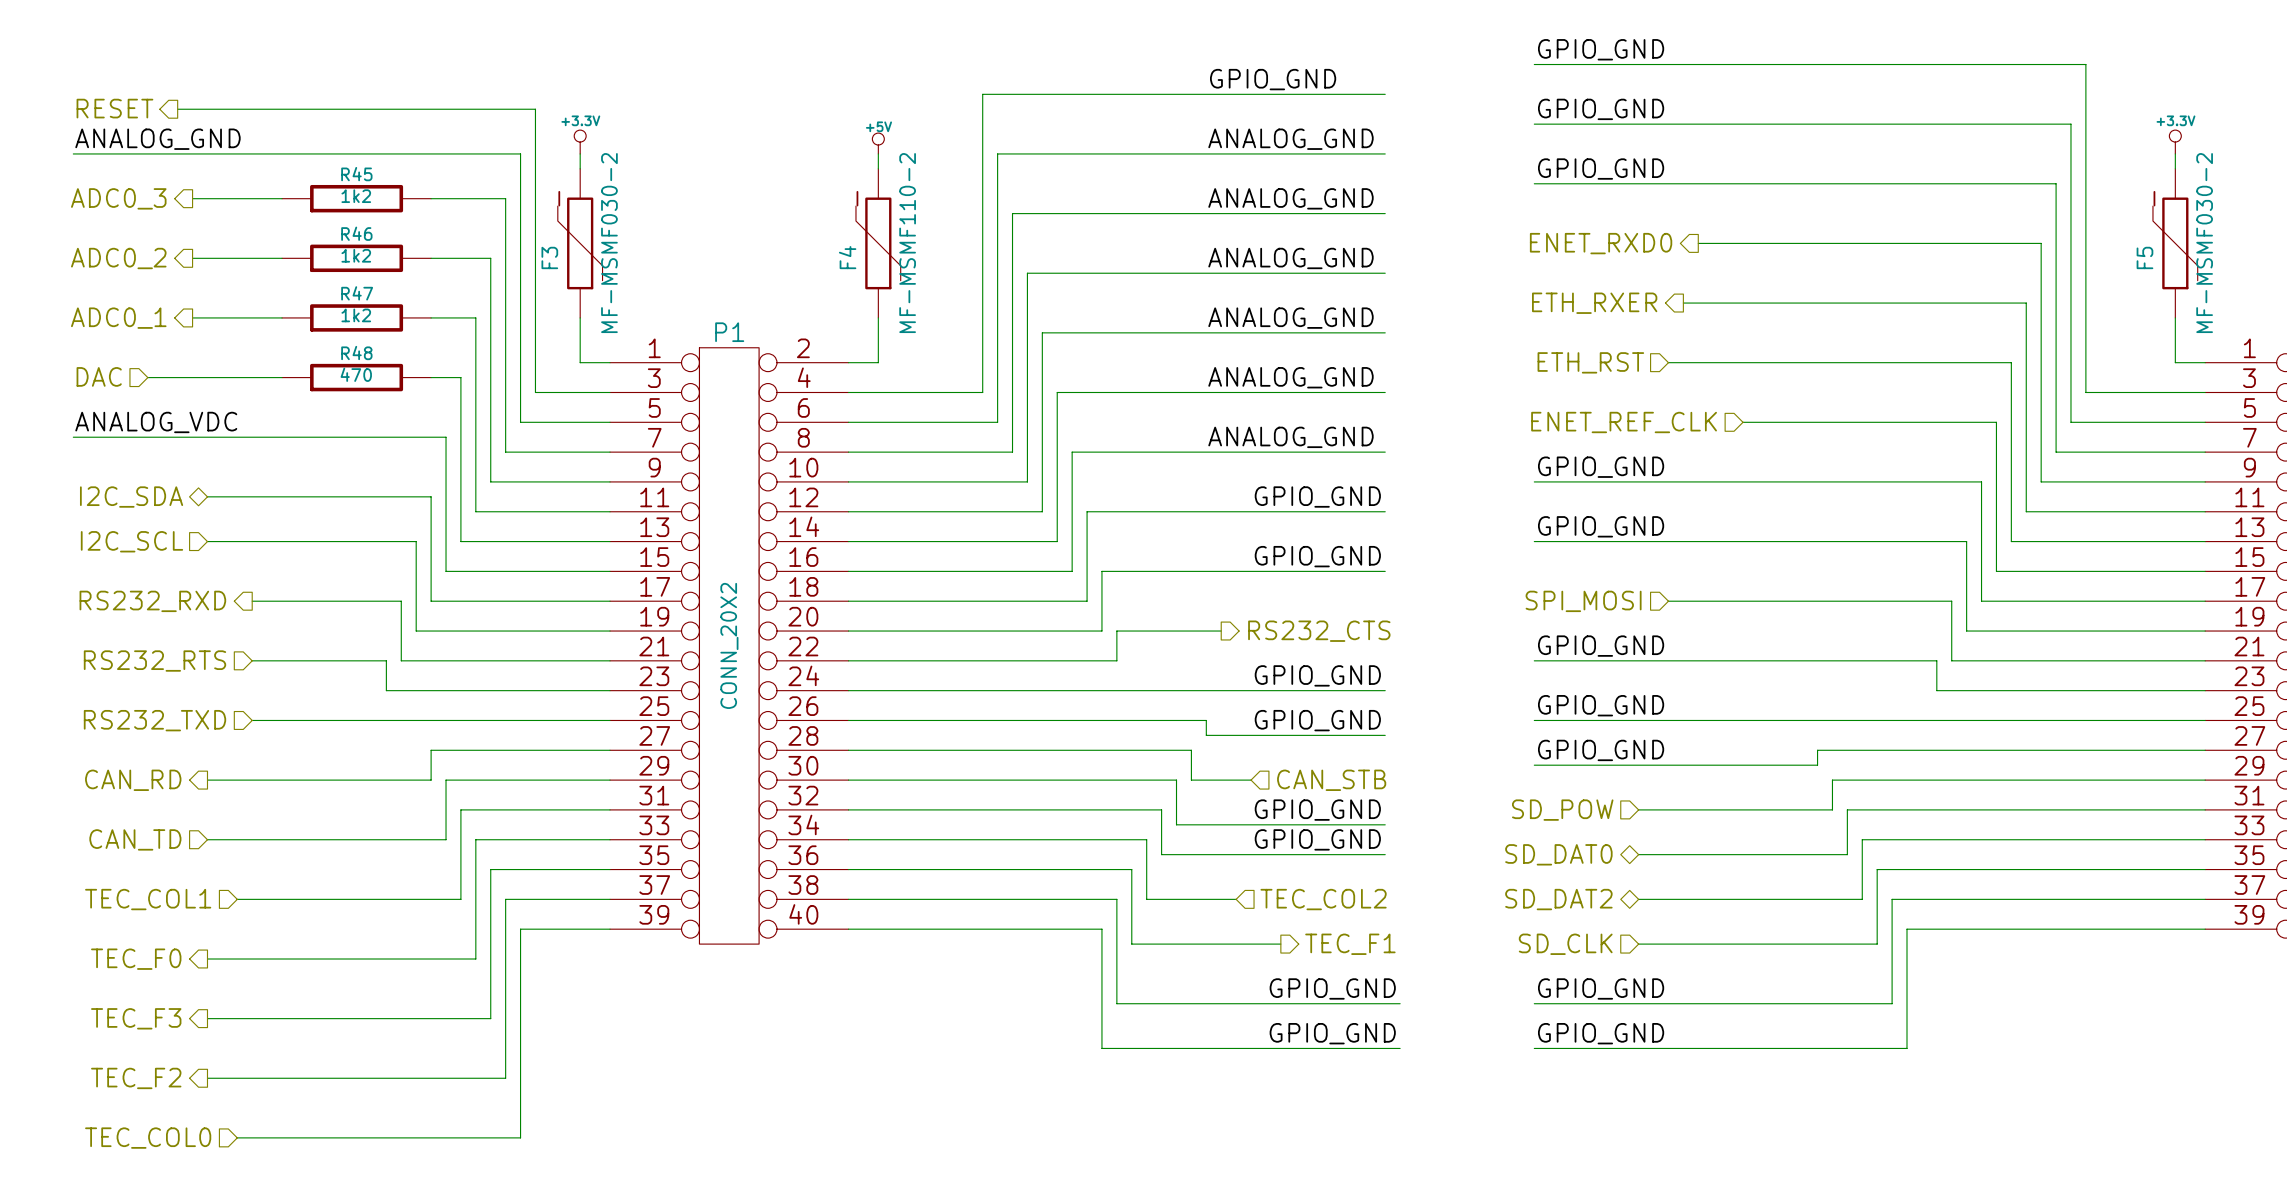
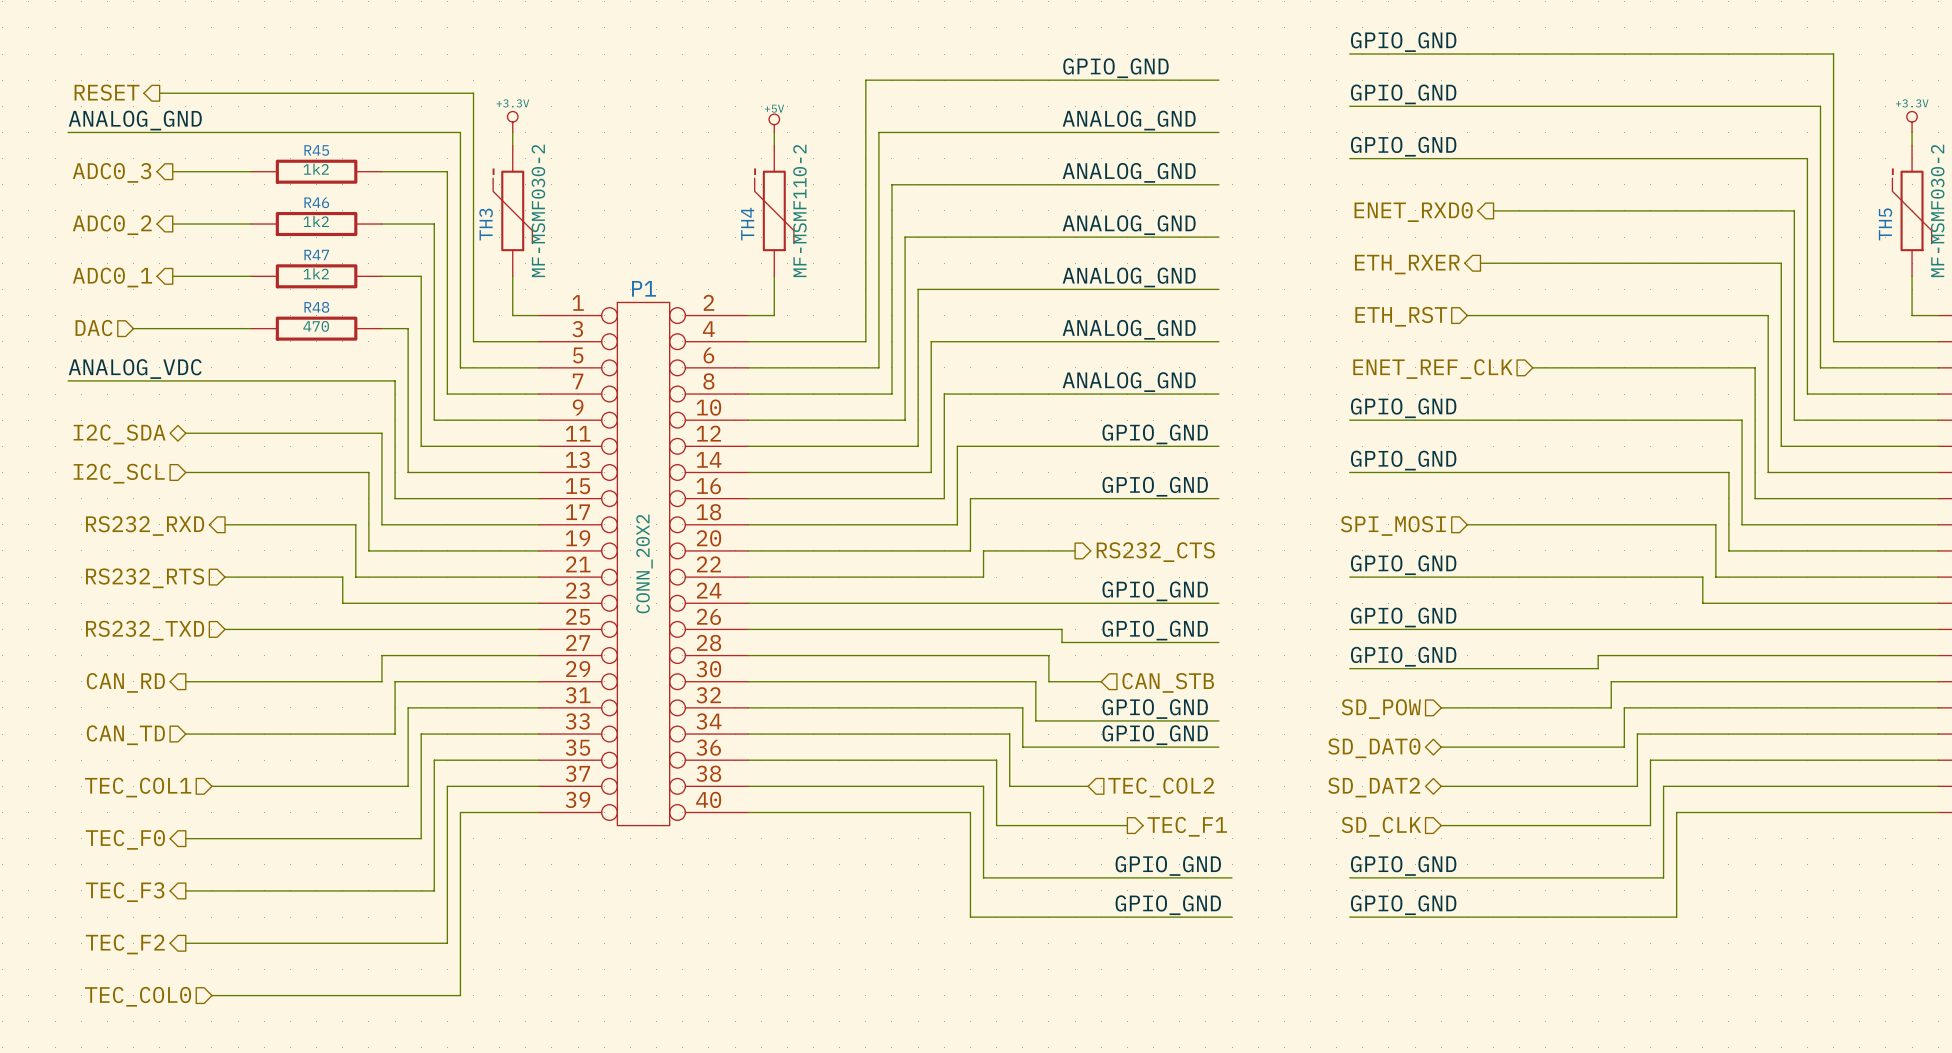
F3 name: F3 (549, 257) -> TH3 (486, 224)
F4 name: F4 (847, 257) -> TH4 (747, 224)
F5 name: F5 (2144, 257) -> TH5 (1885, 224)

